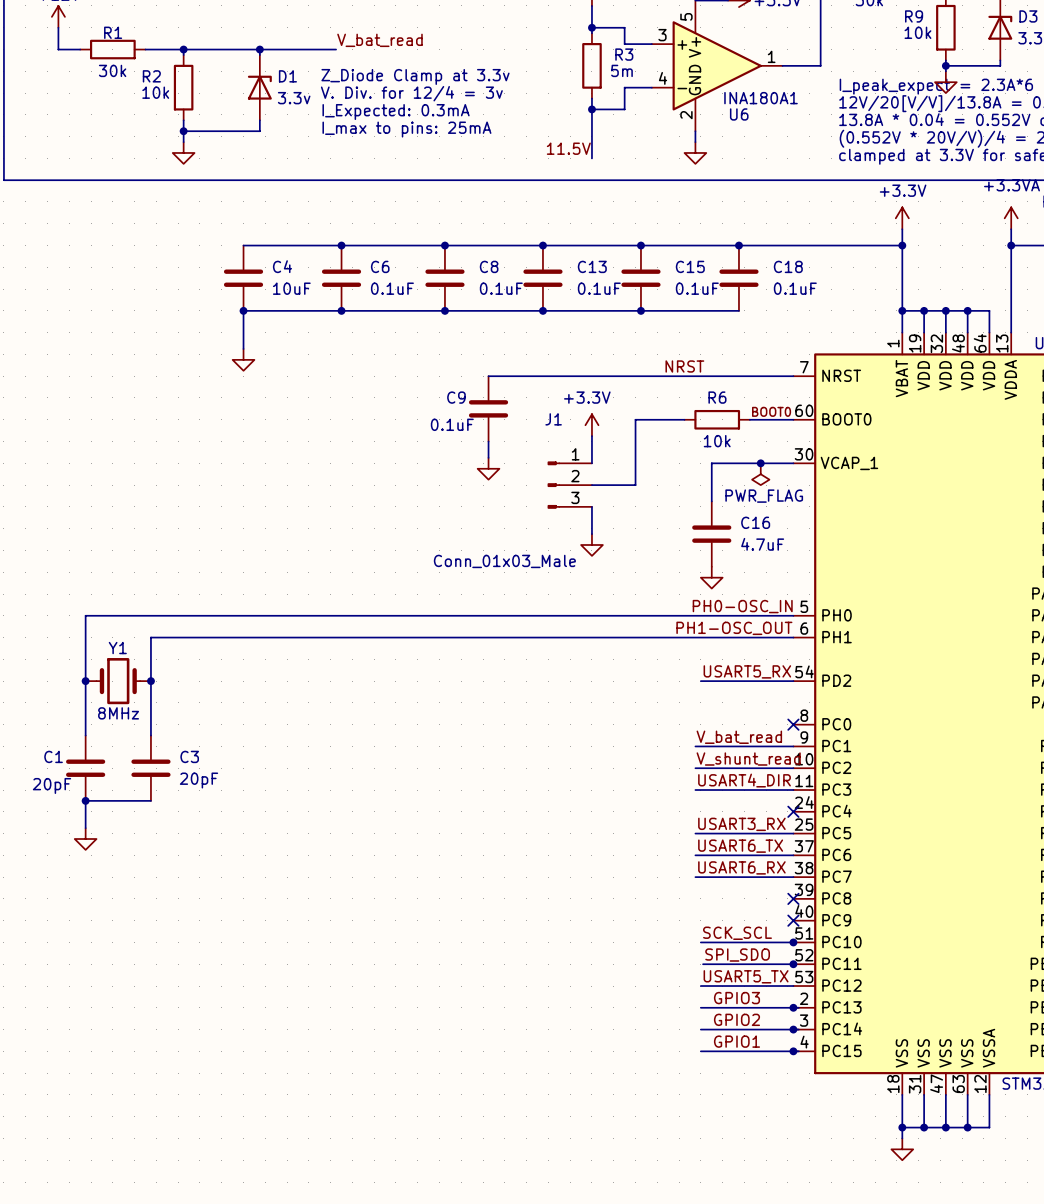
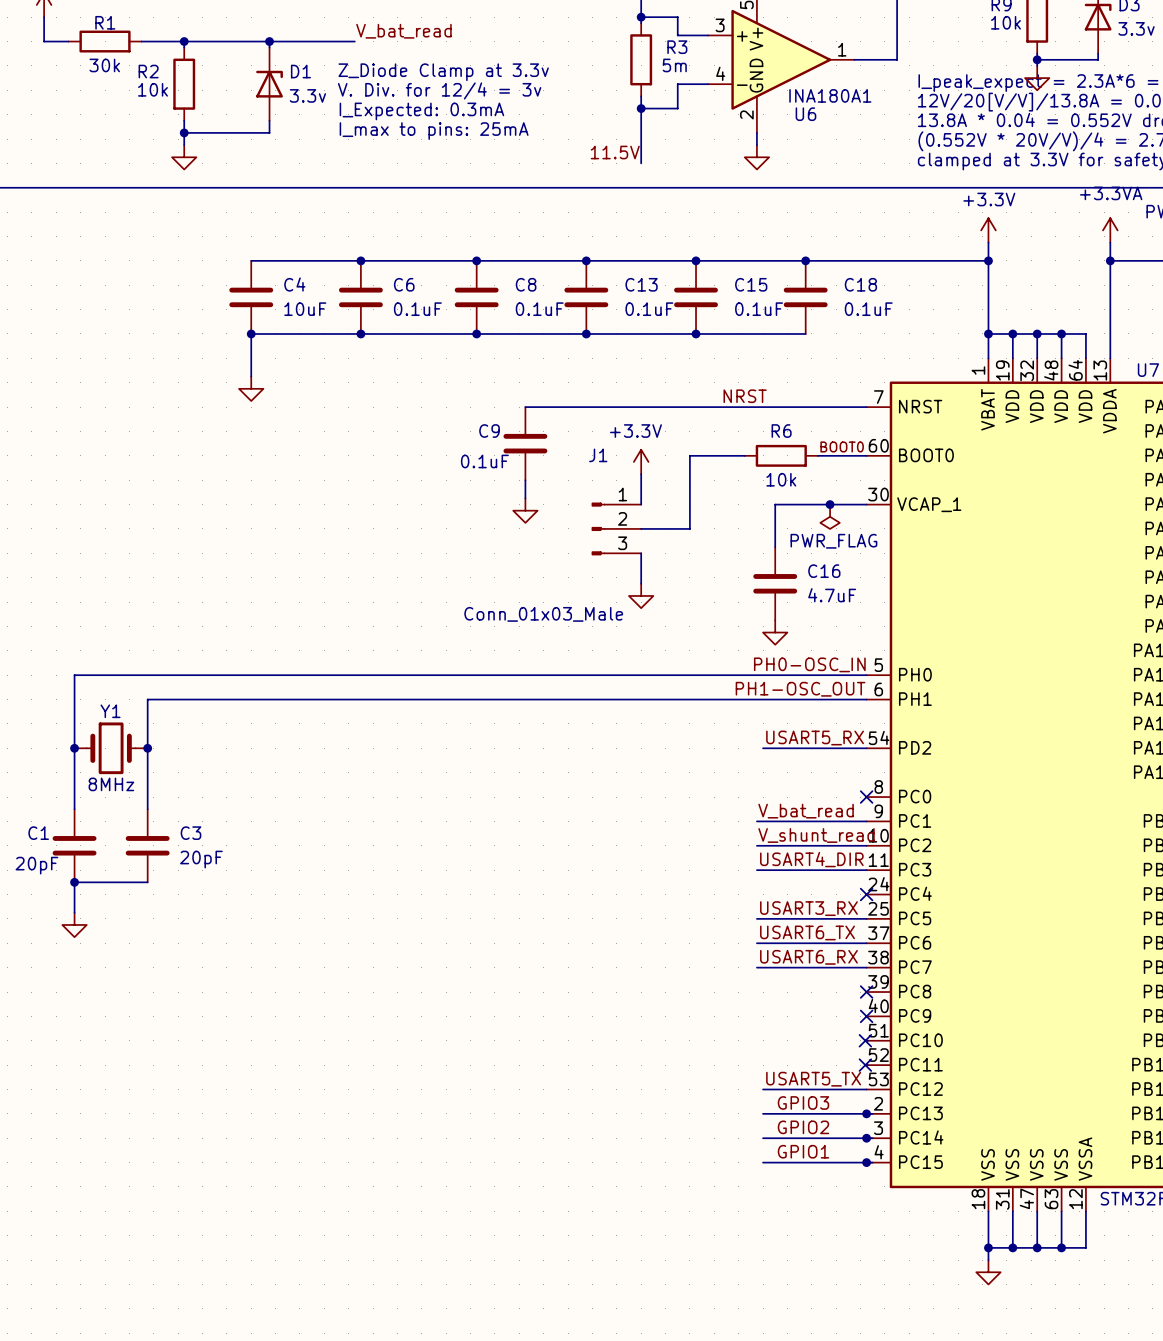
label: SCK_SCL (737, 933) -> none
wire: (700, 942) (792, 942) -> none
no-connect mark: none -> (865, 1040)
junction: (793, 942) -> none
label: SPI_SDO (737, 955) -> none
wire: (703, 964) (792, 964) -> none
no-connect mark: none -> (865, 1065)
junction: (793, 964) -> none

